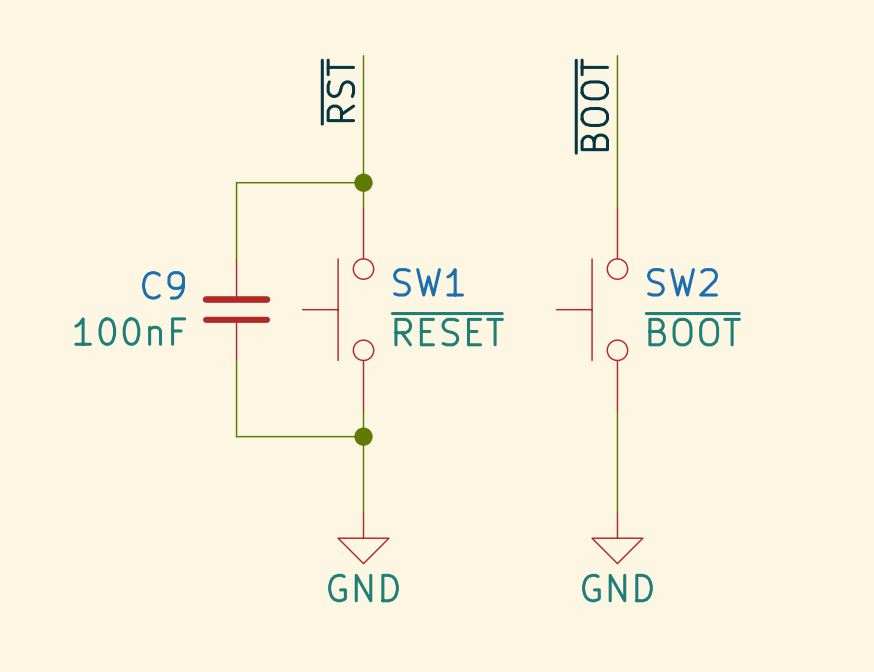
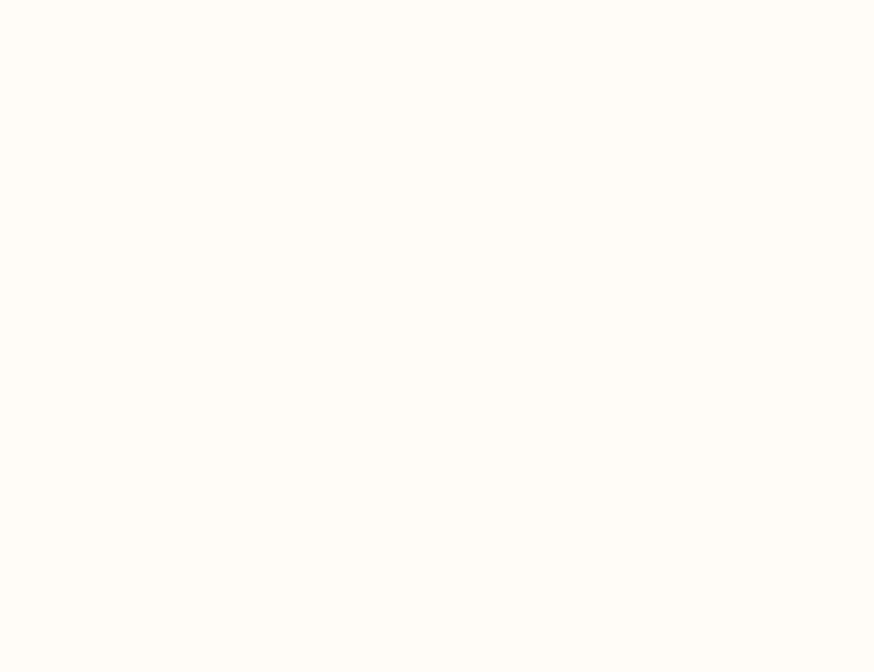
wire: (363, 55) (363, 208) -> none
wire: (617, 55) (617, 208) -> none
label: ~{RST} (337, 92) -> none
label: ~{BOOT} (591, 106) -> none
wire: (363, 182) (236, 182) (236, 258) -> none
junction: (363, 182) -> none
C9: 100nF (236, 309) -> none
SW1: ~{RESET} (338, 309) -> none
SW2: ~{BOOT} (592, 309) -> none
wire: (236, 360) (236, 436) (363, 436) -> none
wire: (363, 411) (363, 512) -> none
wire: (617, 411) (617, 512) -> none
junction: (363, 436) -> none
power symbol: GND (363, 538) -> none
power symbol: GND (617, 538) -> none

